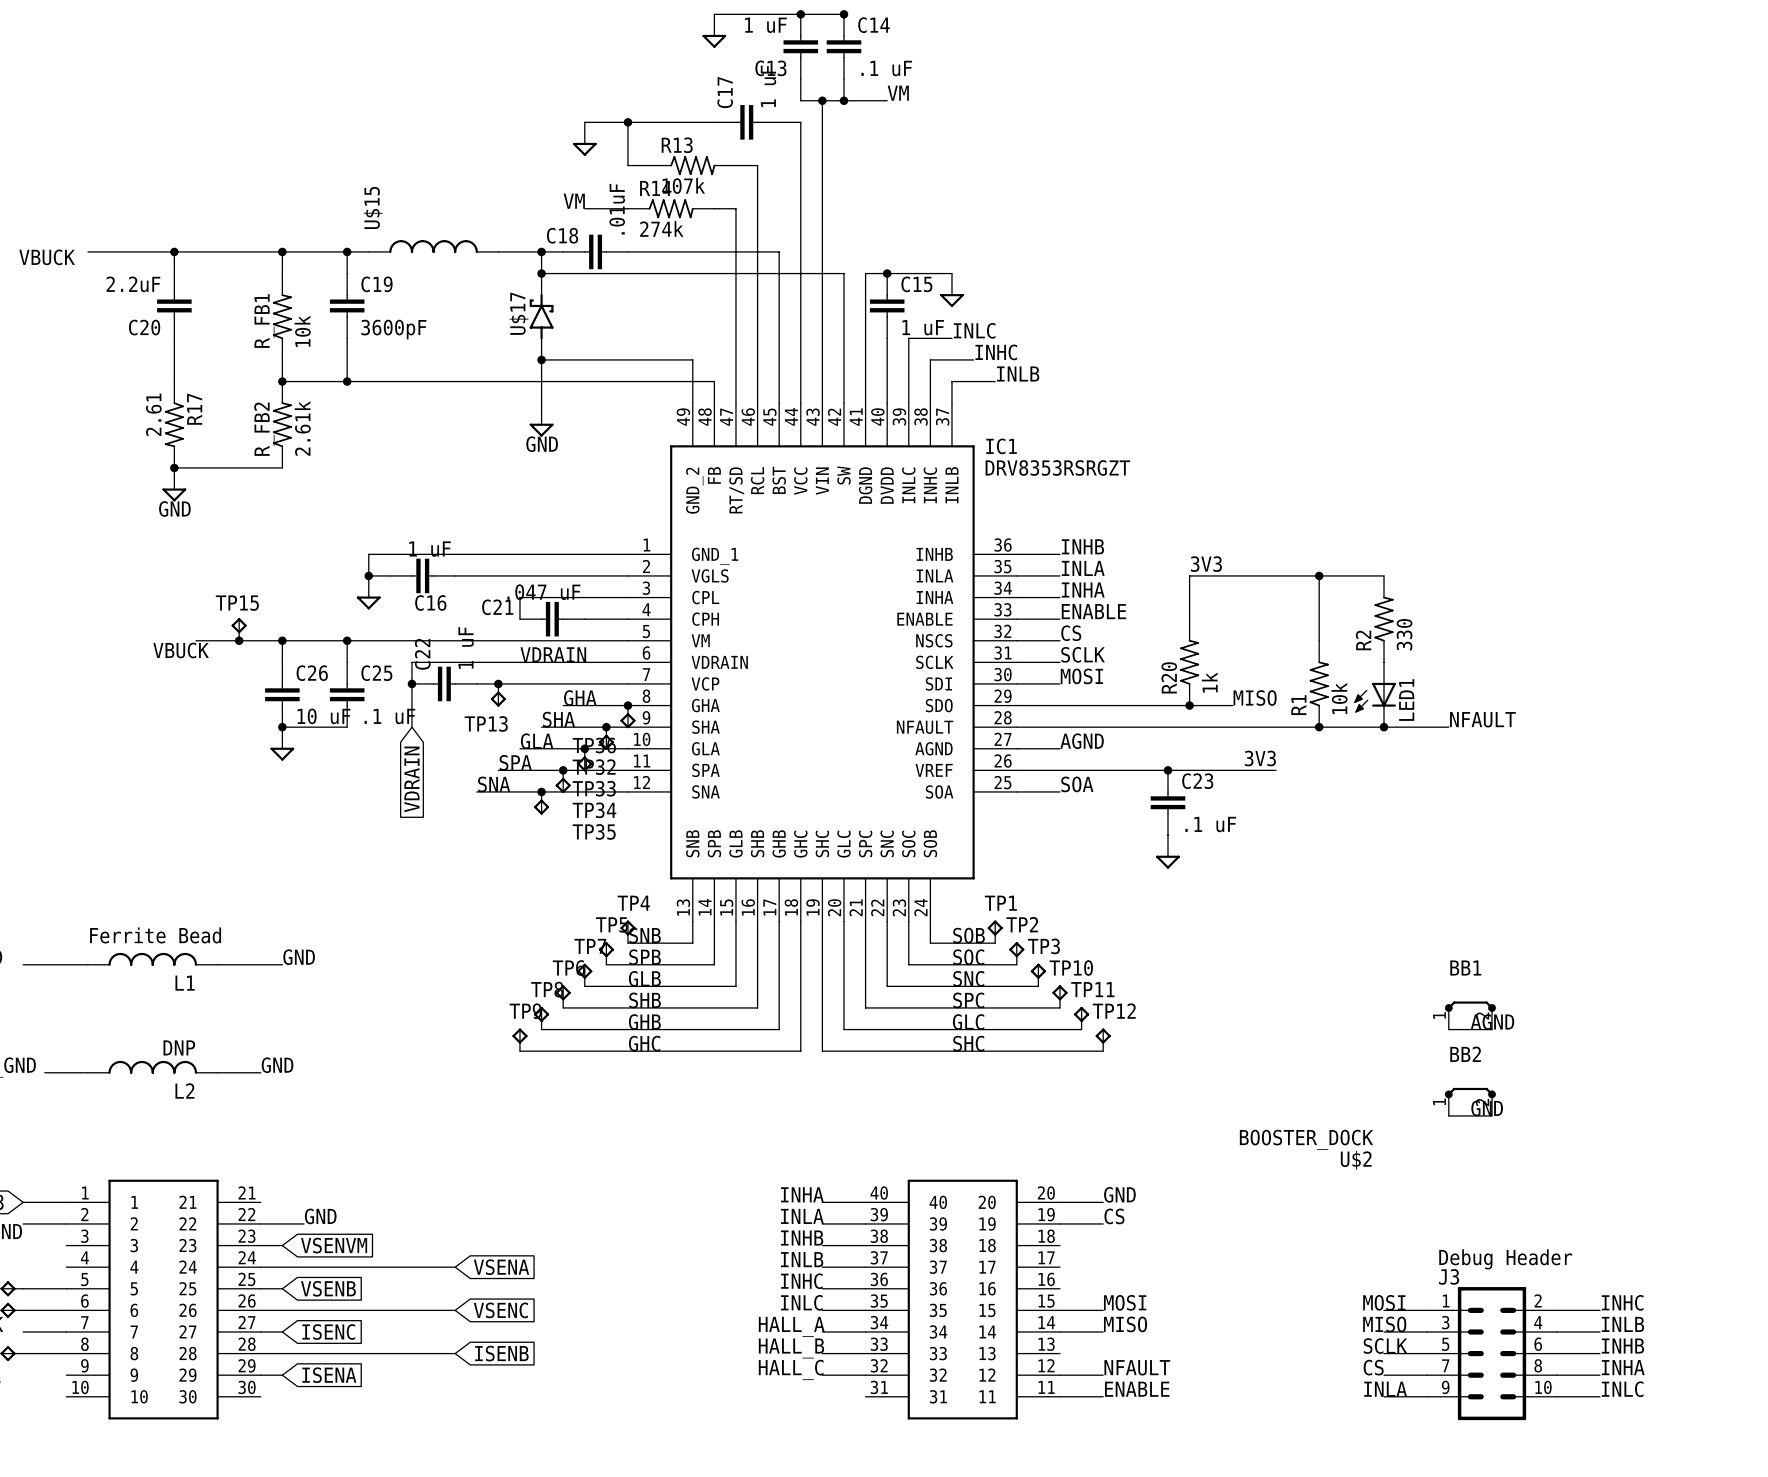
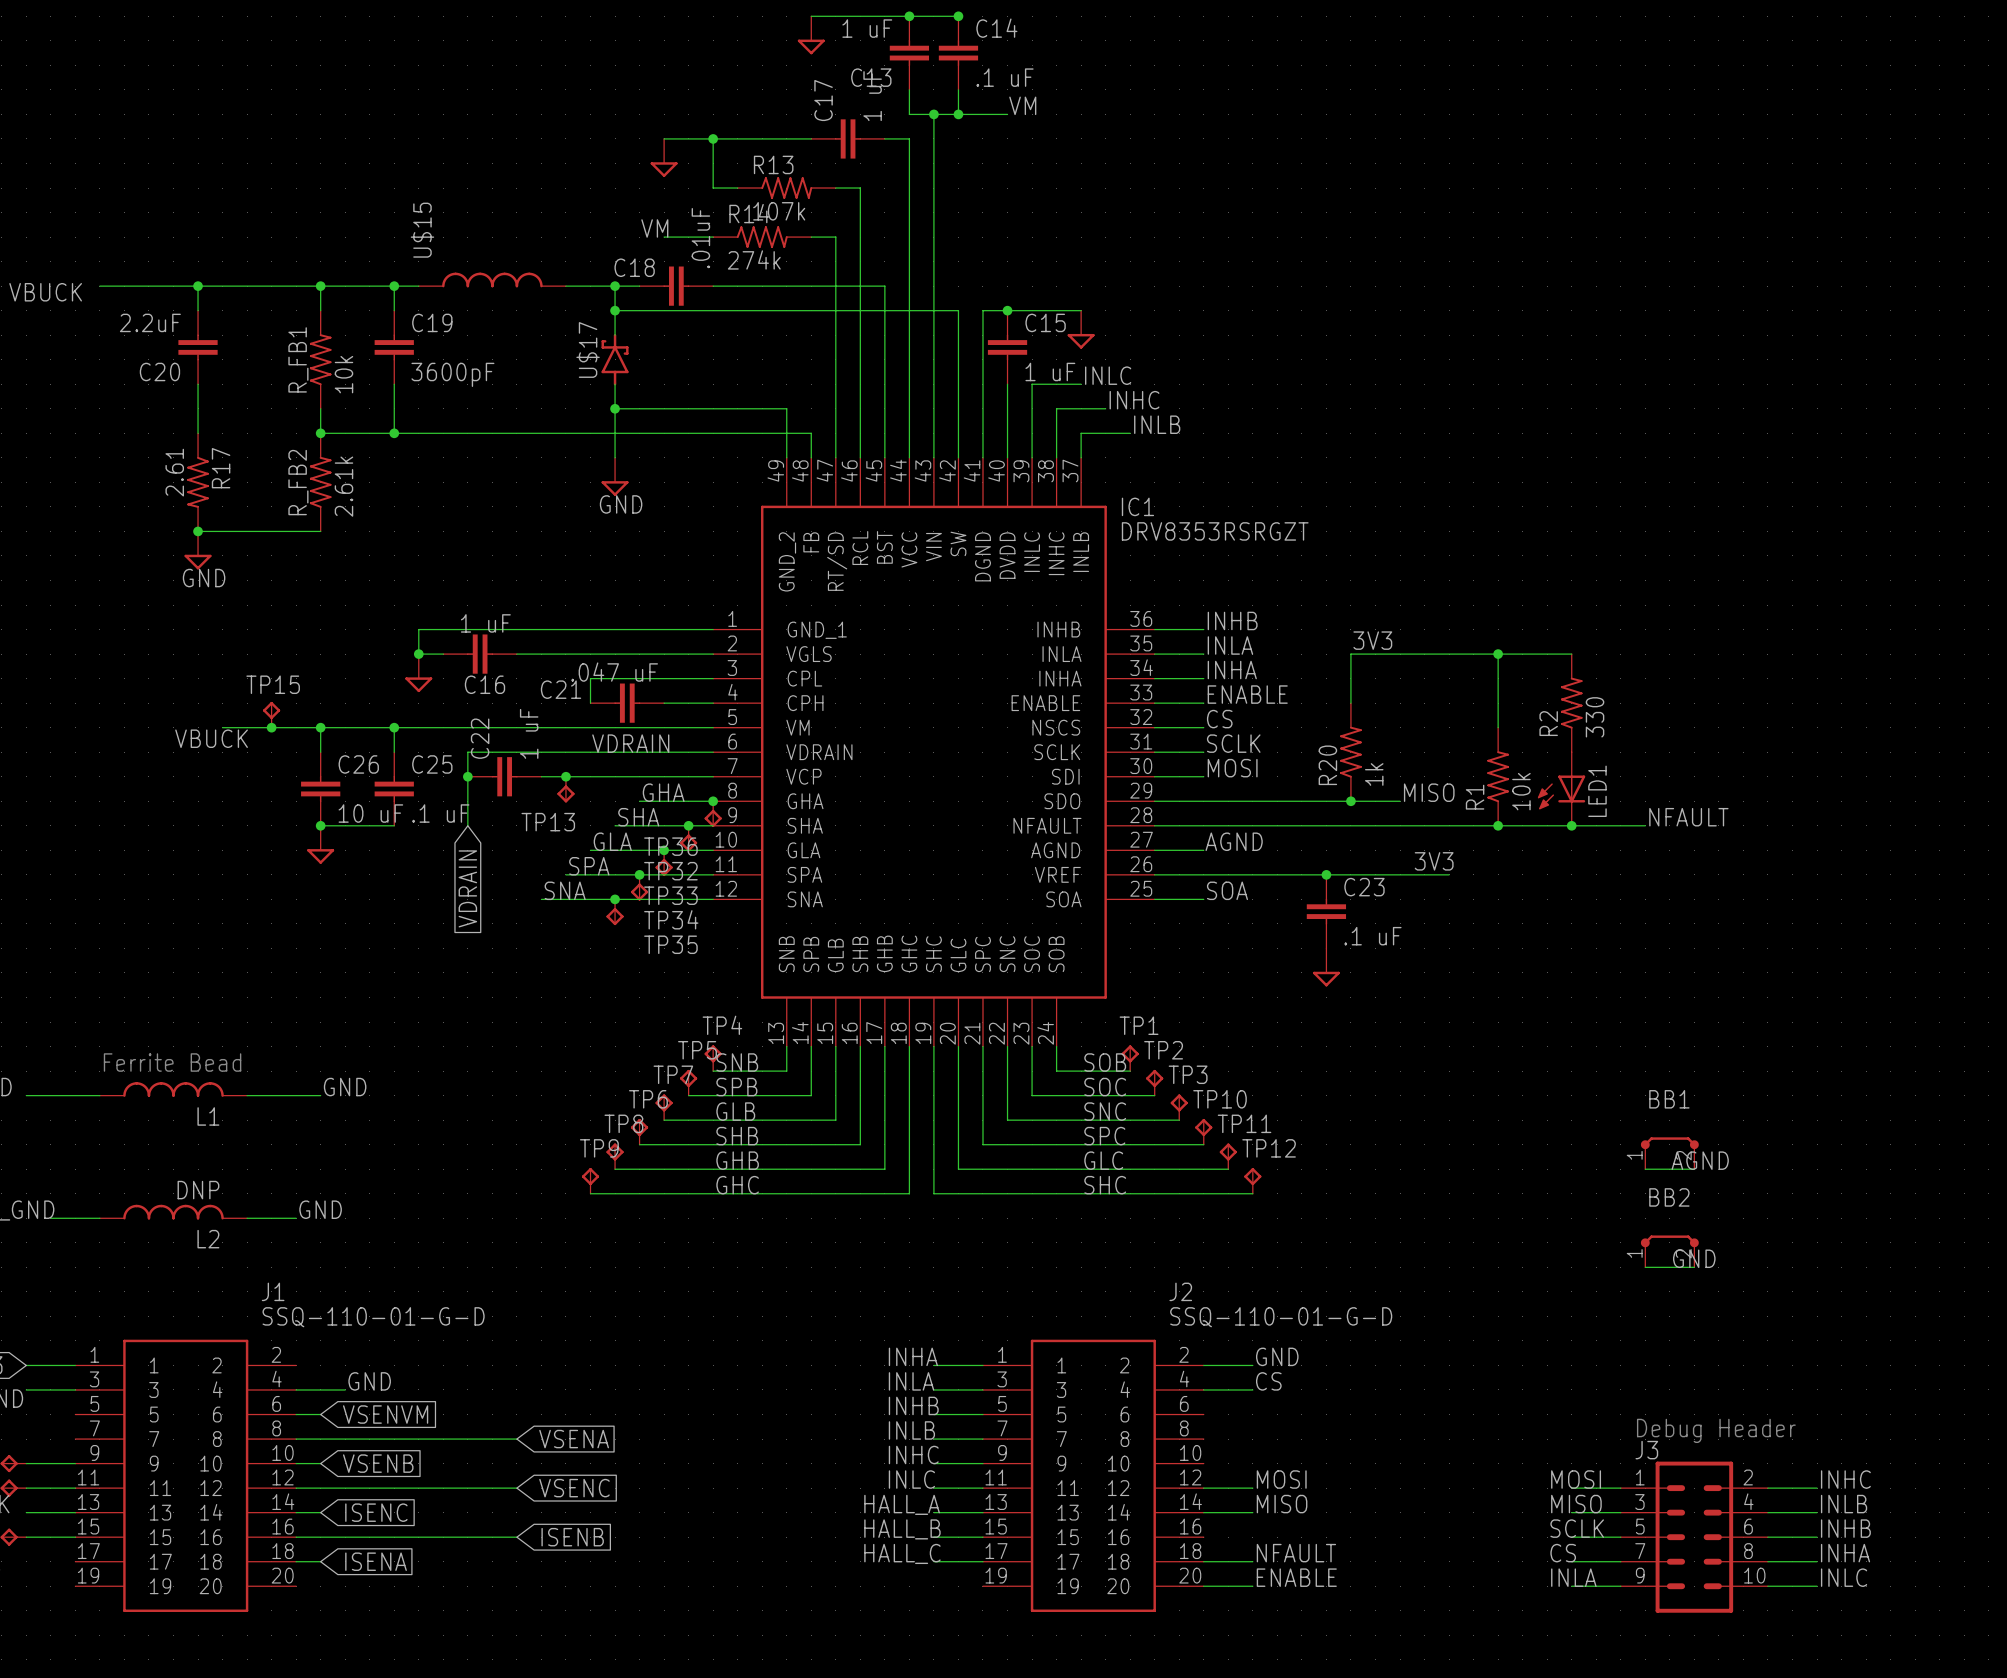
J1: none -> SSQ-110-01-G-D (185, 1475)
U$2: BOOSTER_DOCK (563, 1299) -> none
J2: none -> SSQ-110-01-G-D (1093, 1475)

